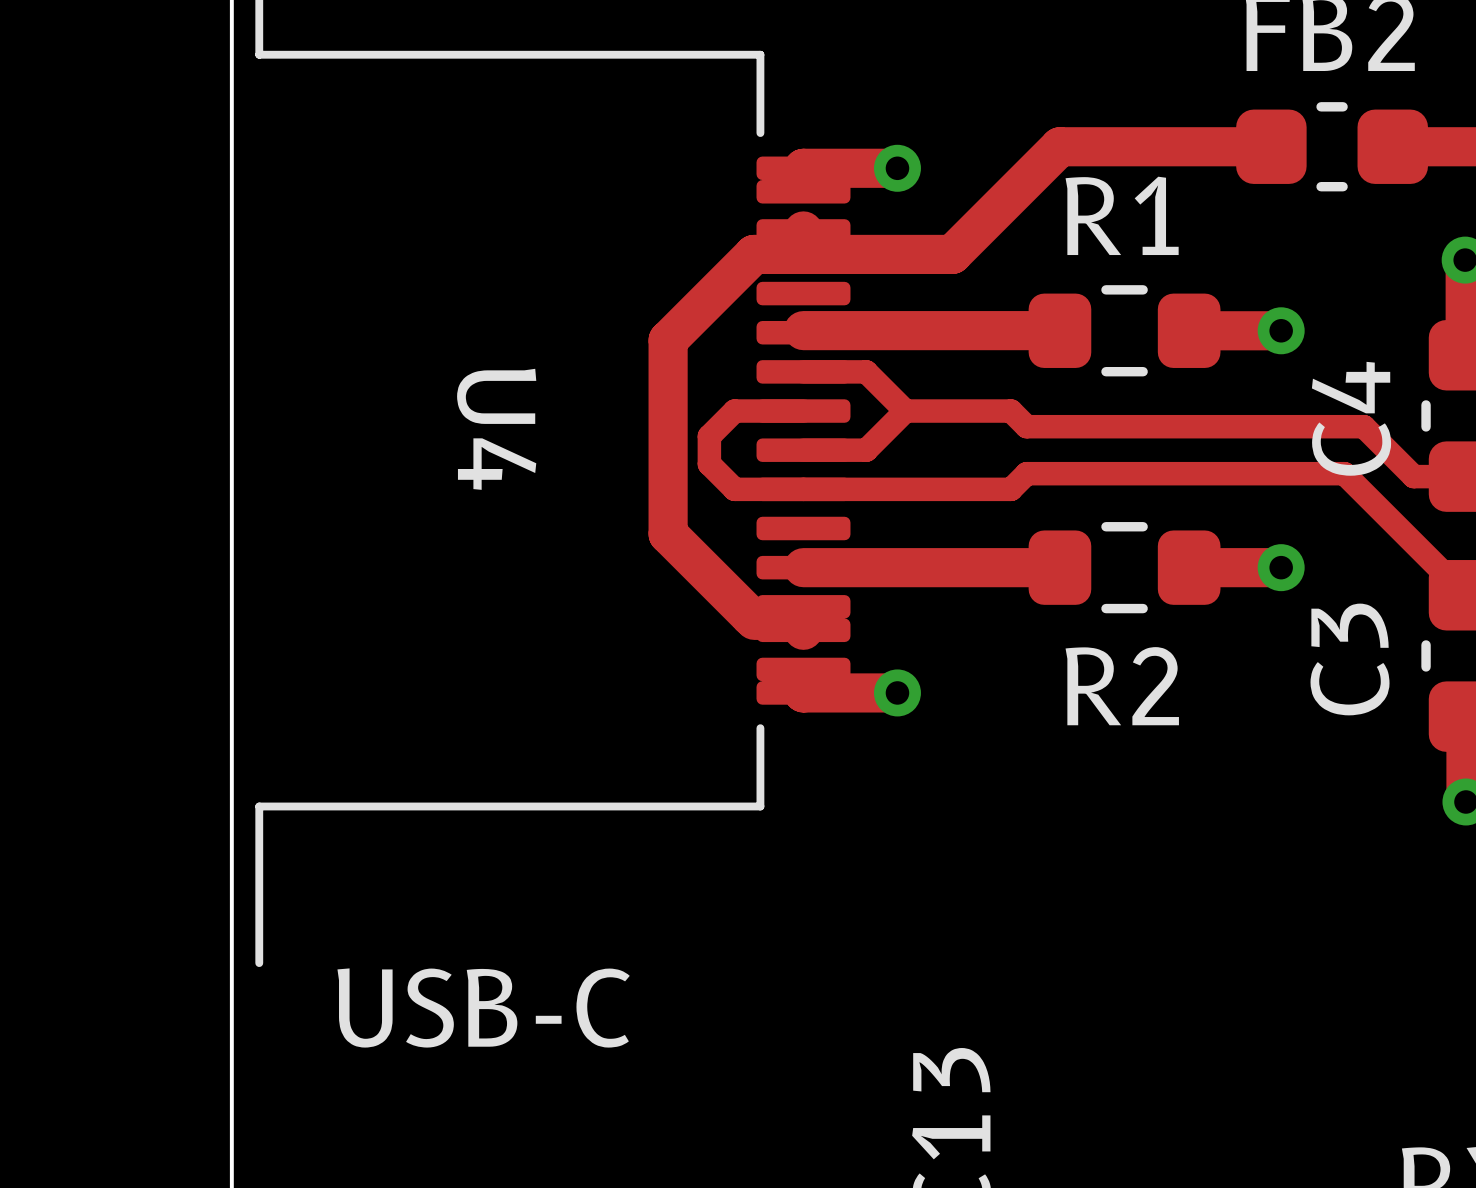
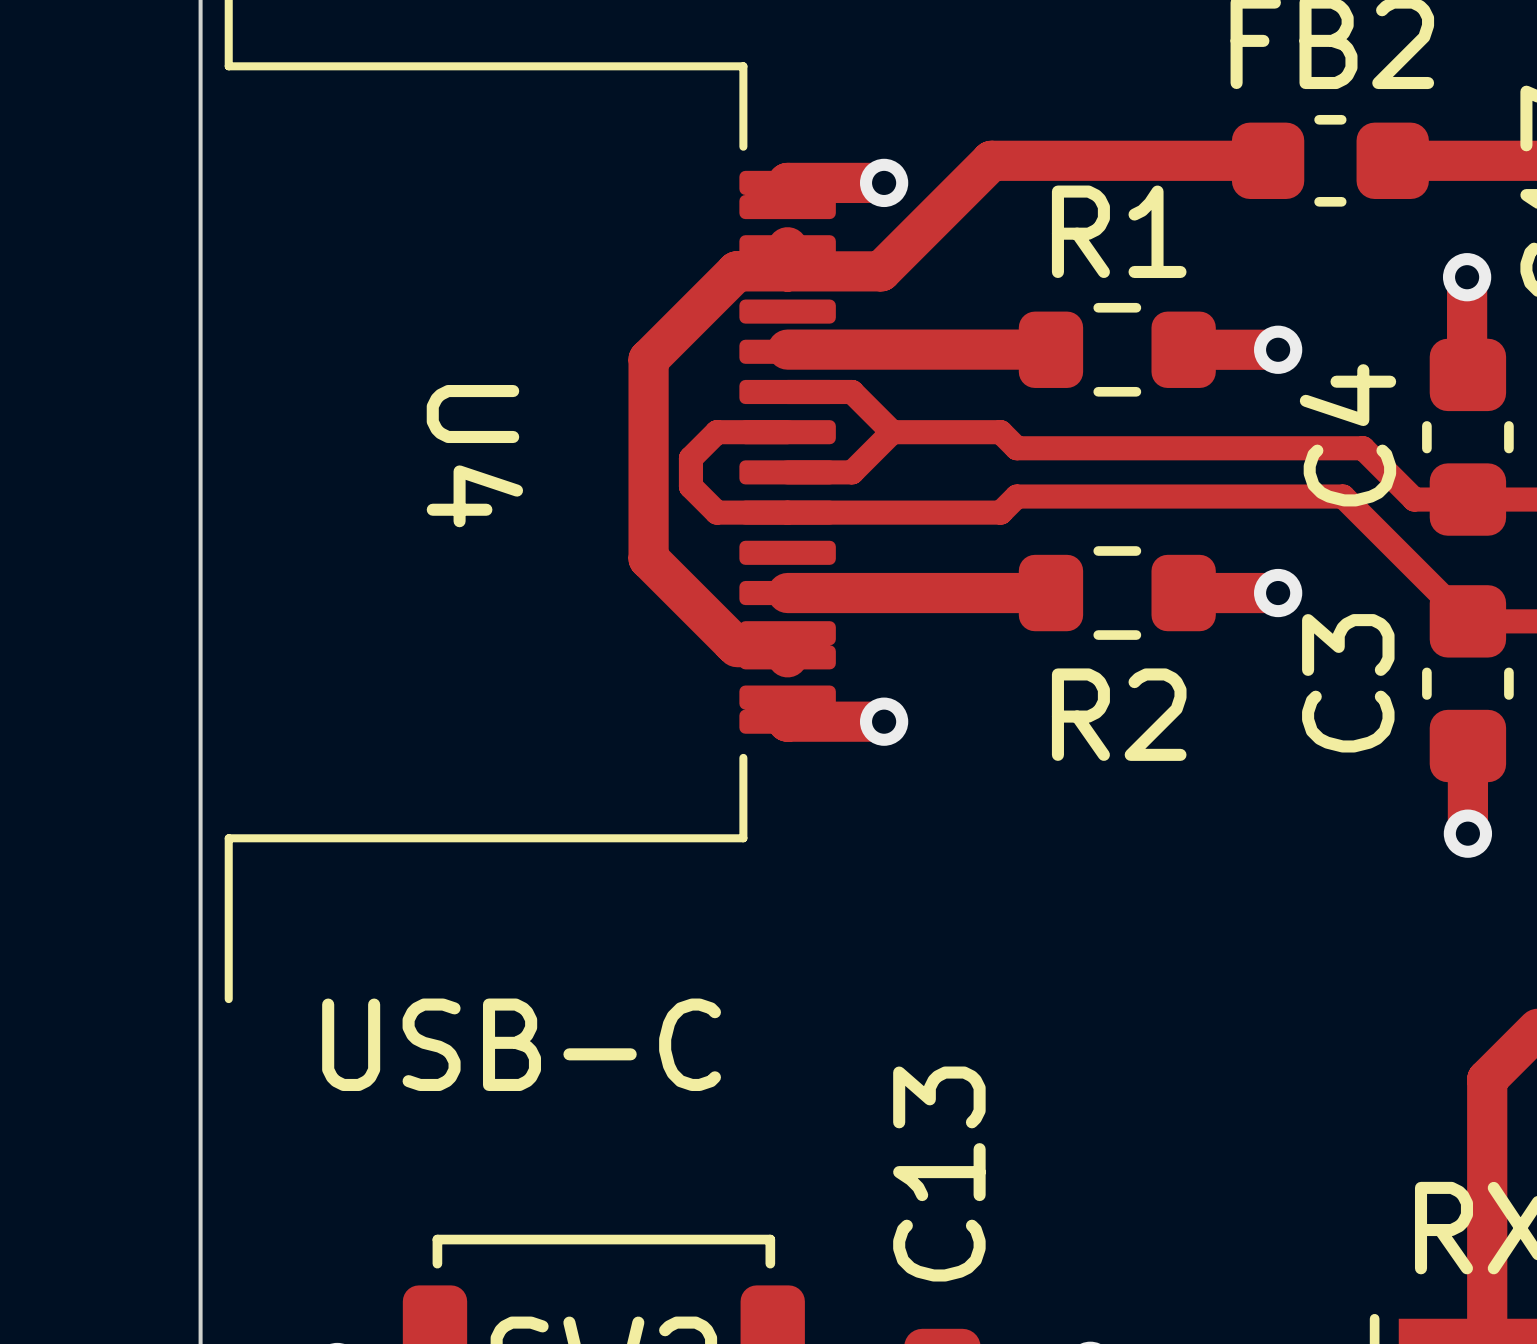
top track: (1059, 146) (952, 254) (894, 254) -> (1050, 160) (991, 160) (880, 271)

